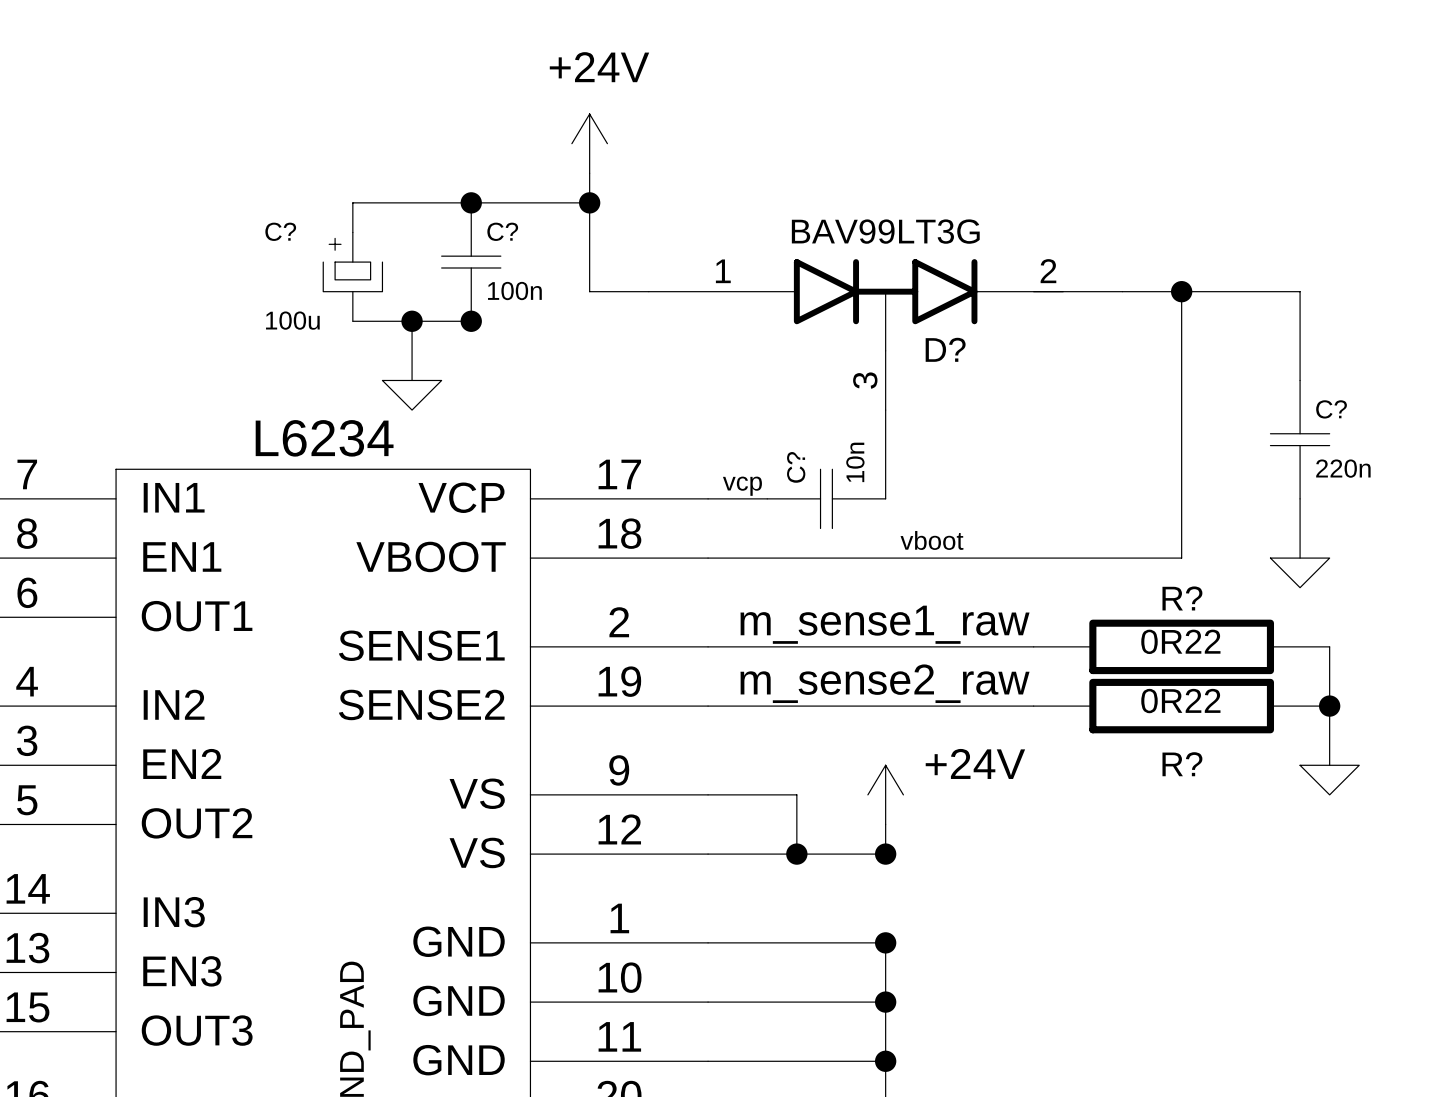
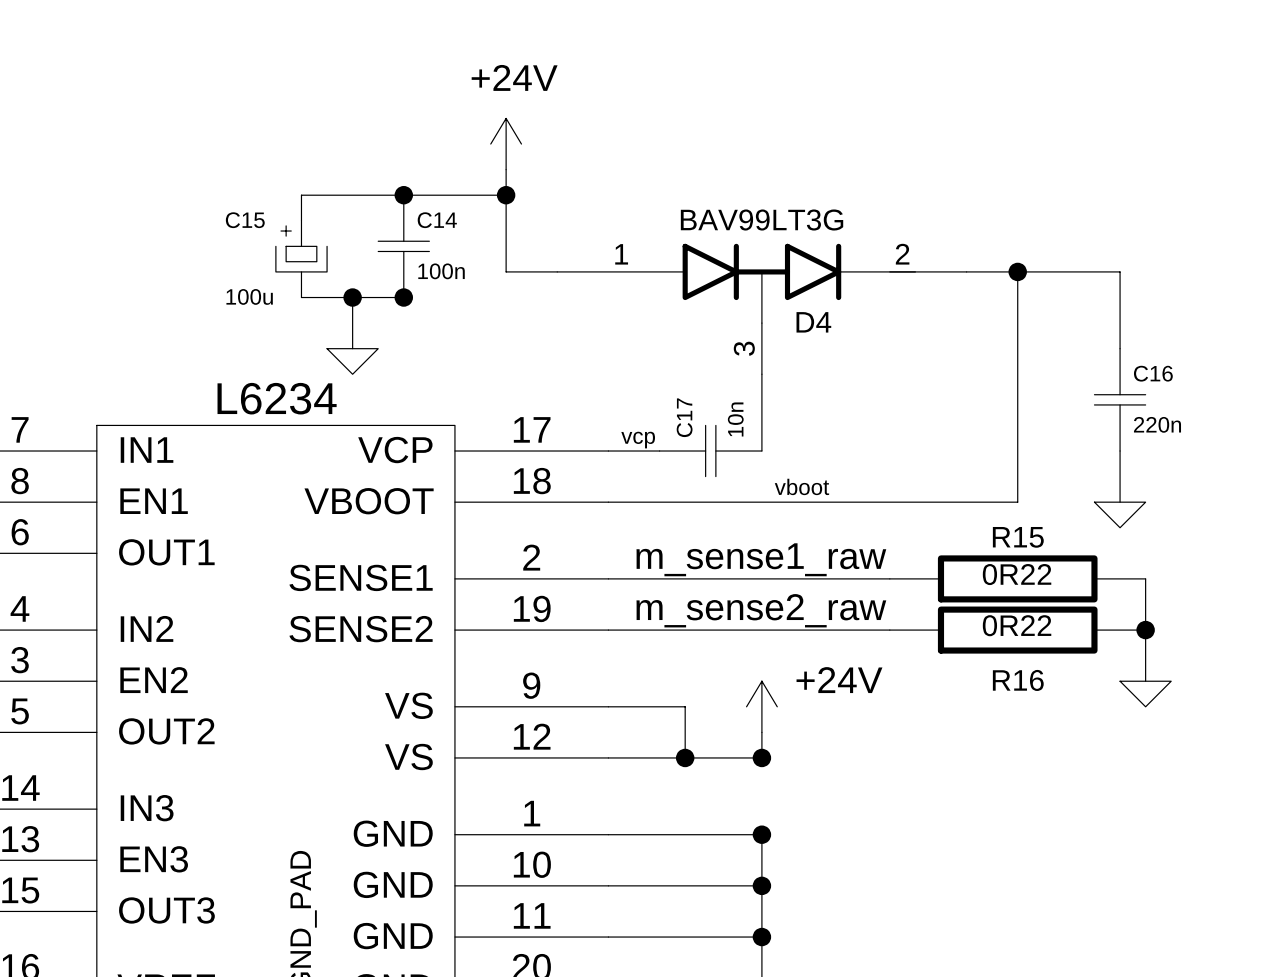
C? name: C? (280, 231) -> C15 (245, 220)
C? name: C? (502, 231) -> C14 (437, 220)
D? name: D? (945, 349) -> D4 (813, 322)
C? name: C? (1331, 409) -> C16 (1153, 373)
C? name: C? (796, 467) -> C17 (684, 417)
R? name: R? (1182, 598) -> R15 (1018, 537)
R? name: R? (1182, 764) -> R16 (1018, 680)

